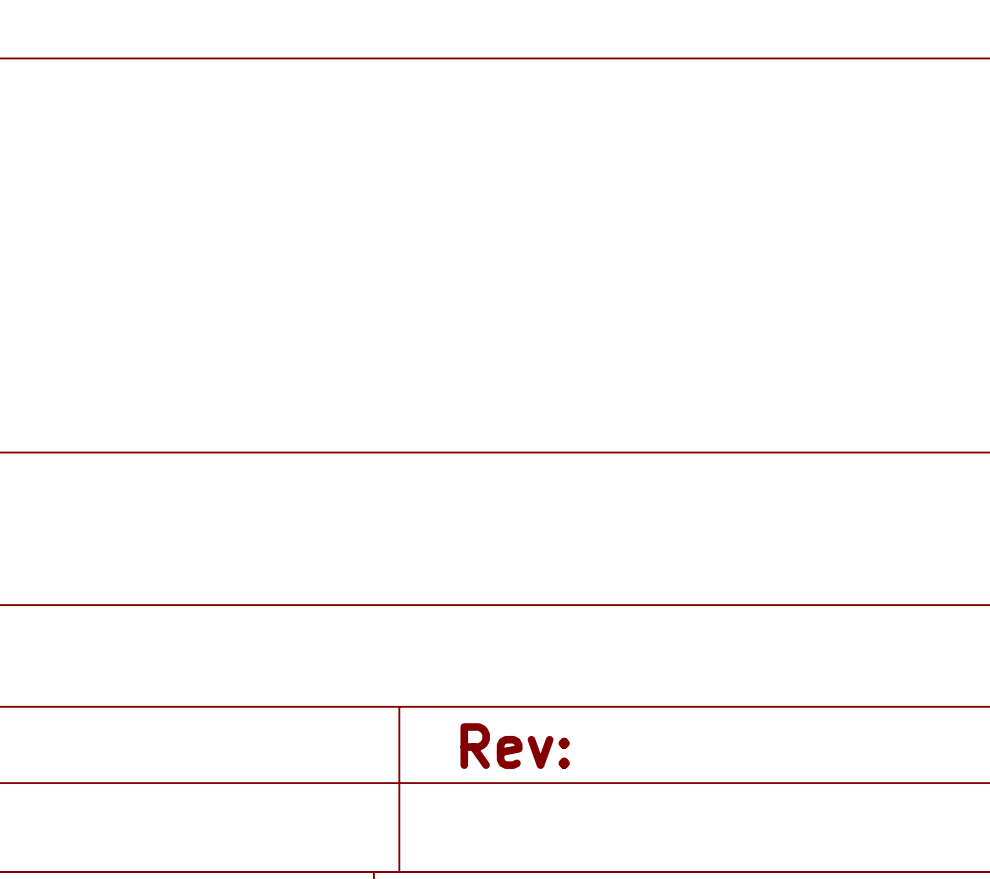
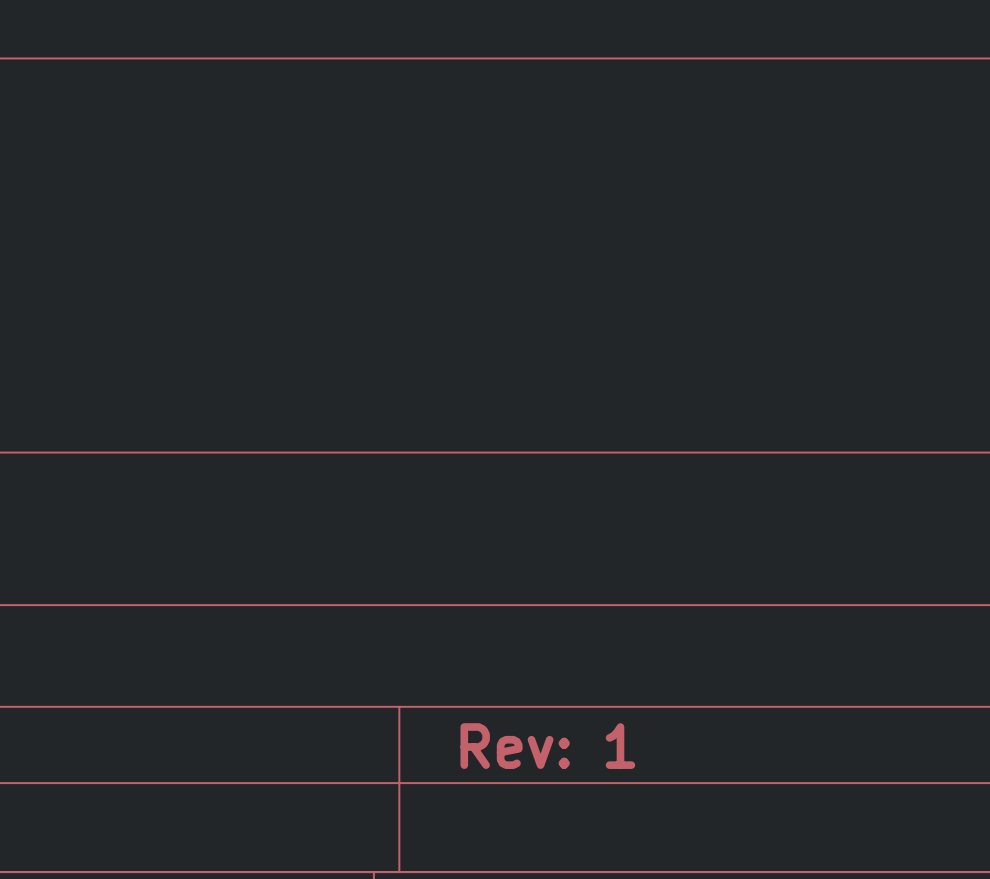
title block: Rev: (515, 746) -> Rev: 1 (547, 746)

